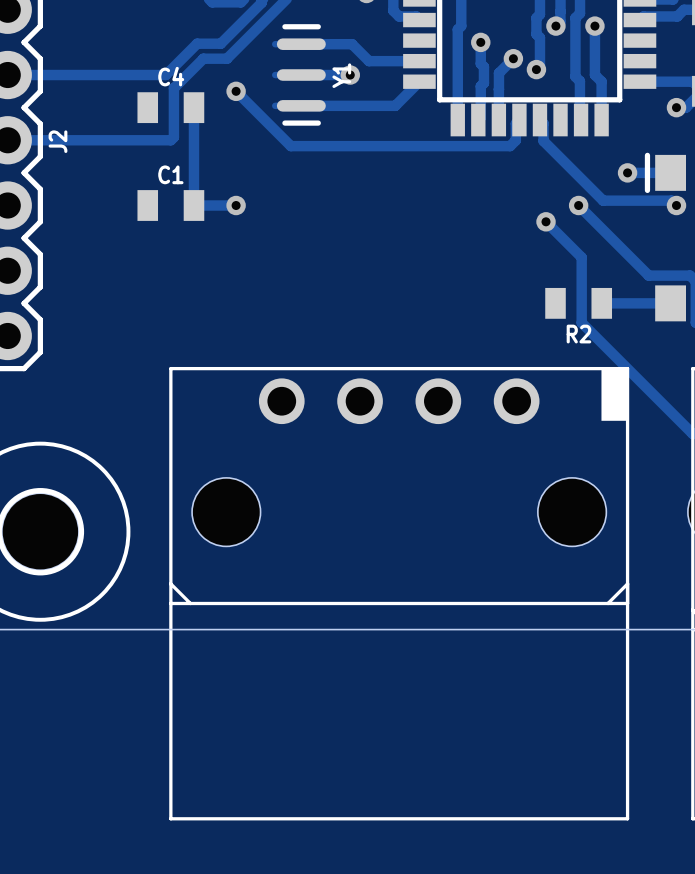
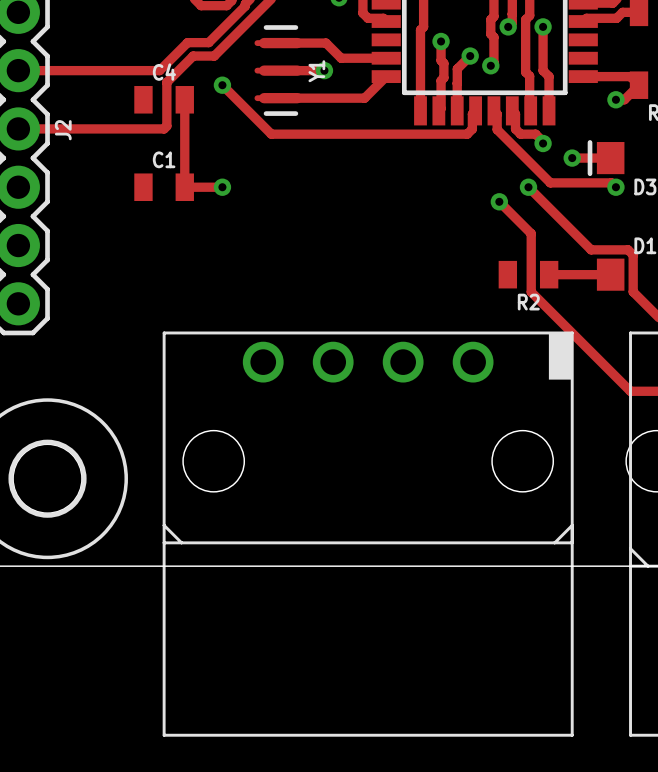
track: none -> (512, 110) (515, 114) (515, 129) (520, 134) (535, 134) (543, 143)
via: none -> (543, 143)

